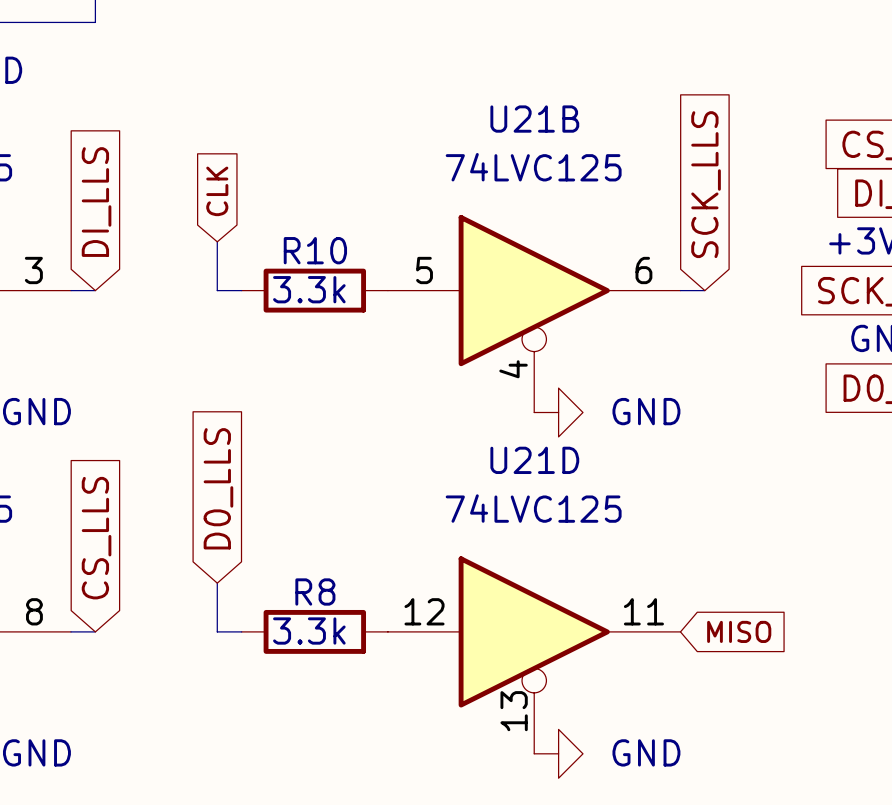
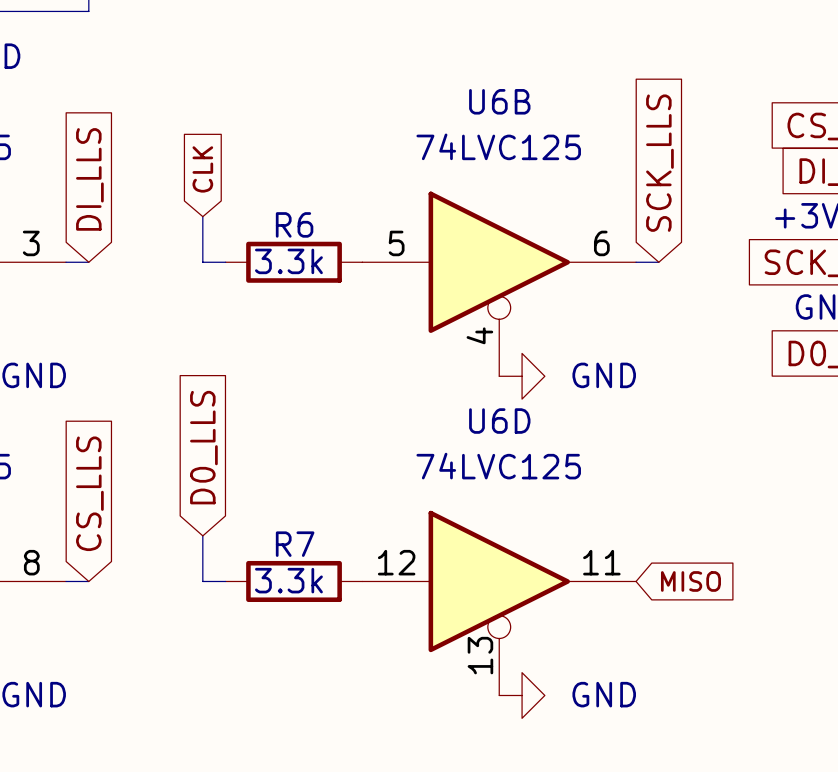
U21B name: U21B (534, 119) -> U6B (499, 101)
R10 name: R10 (315, 250) -> R6 (294, 224)
U21D name: U21D (534, 460) -> U6D (499, 421)
R8 name: R8 (315, 592) -> R7 (295, 544)

